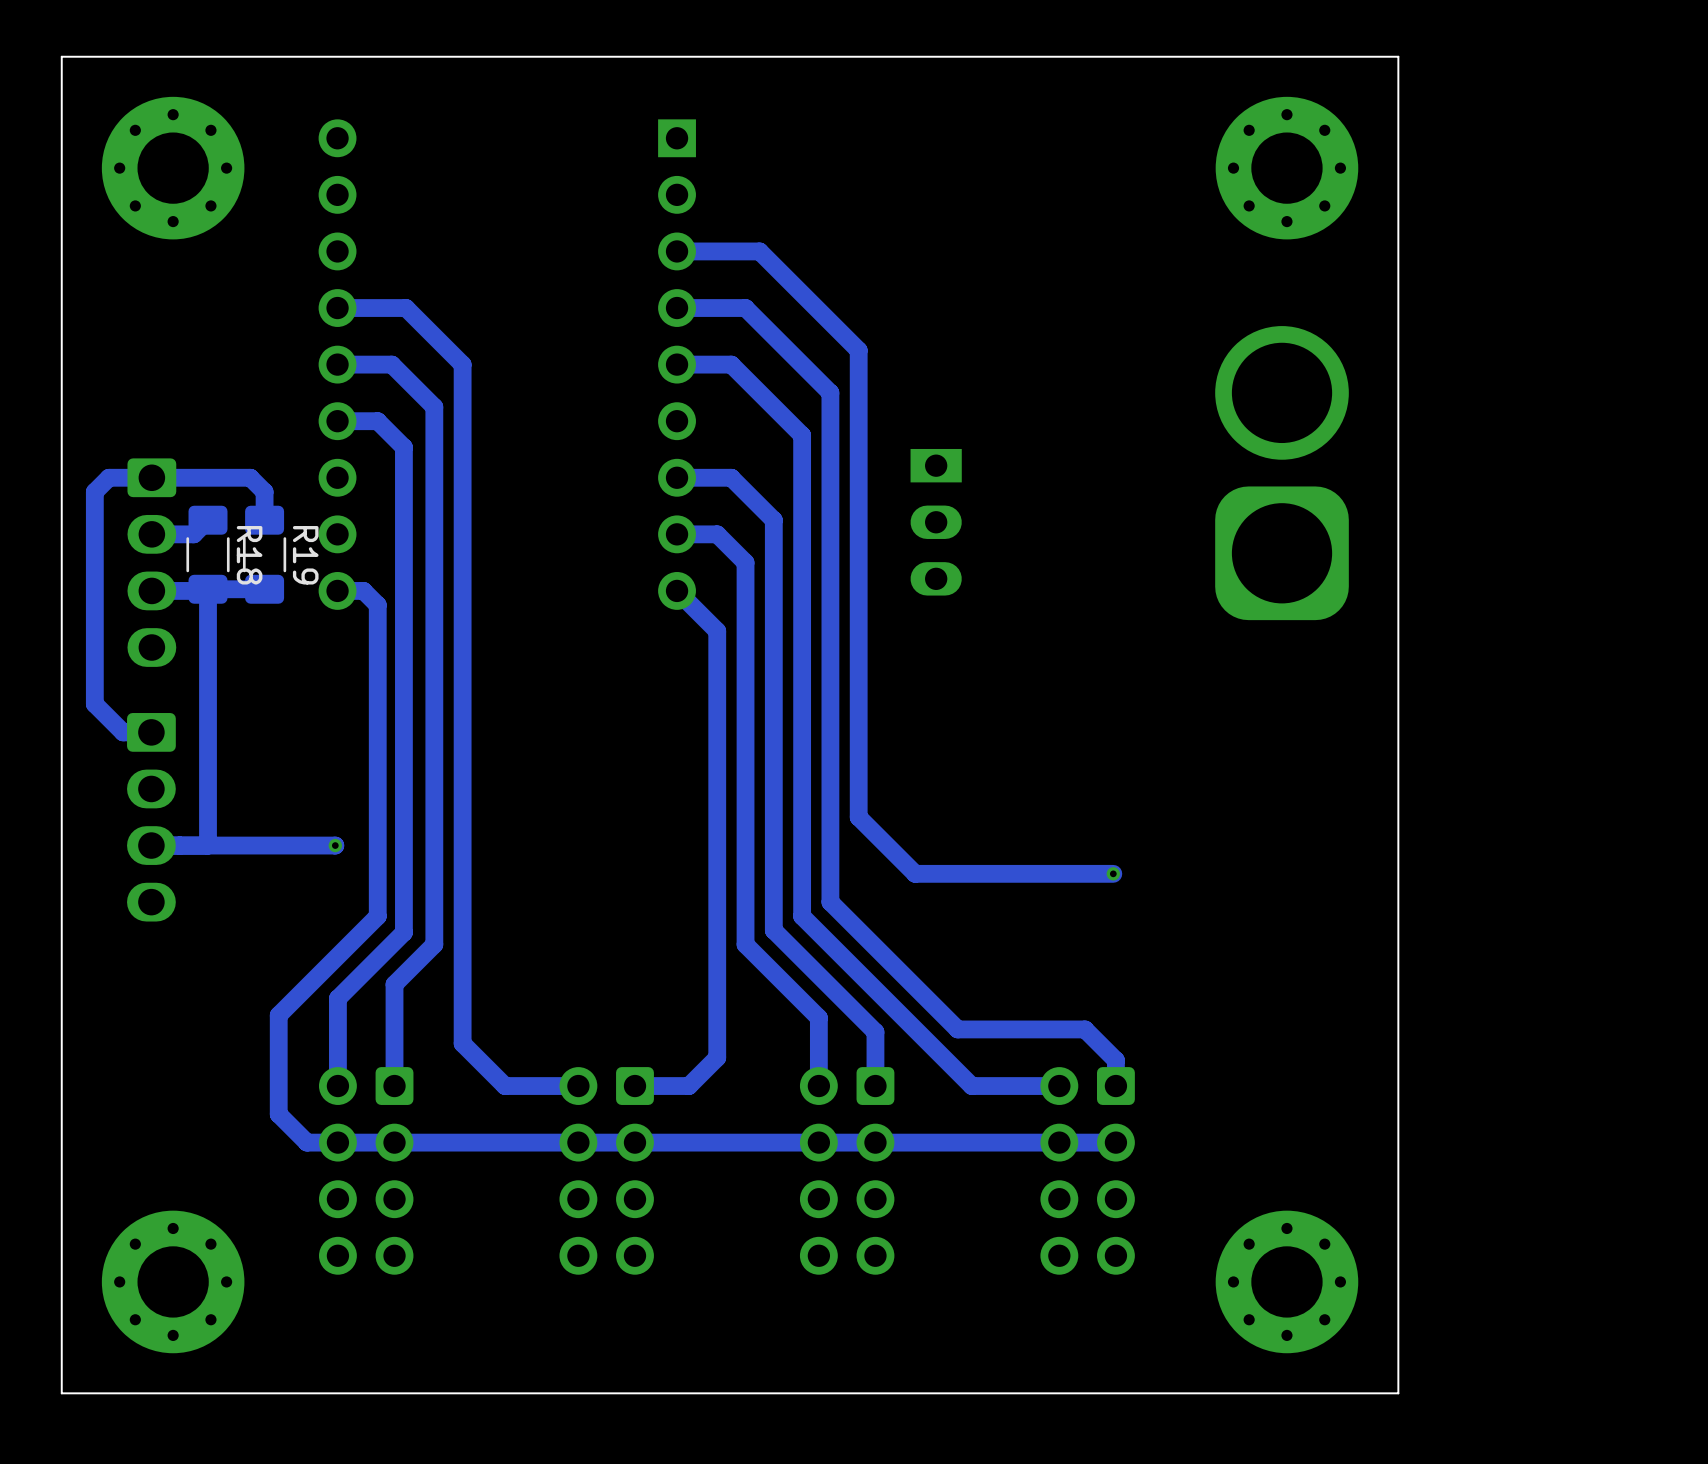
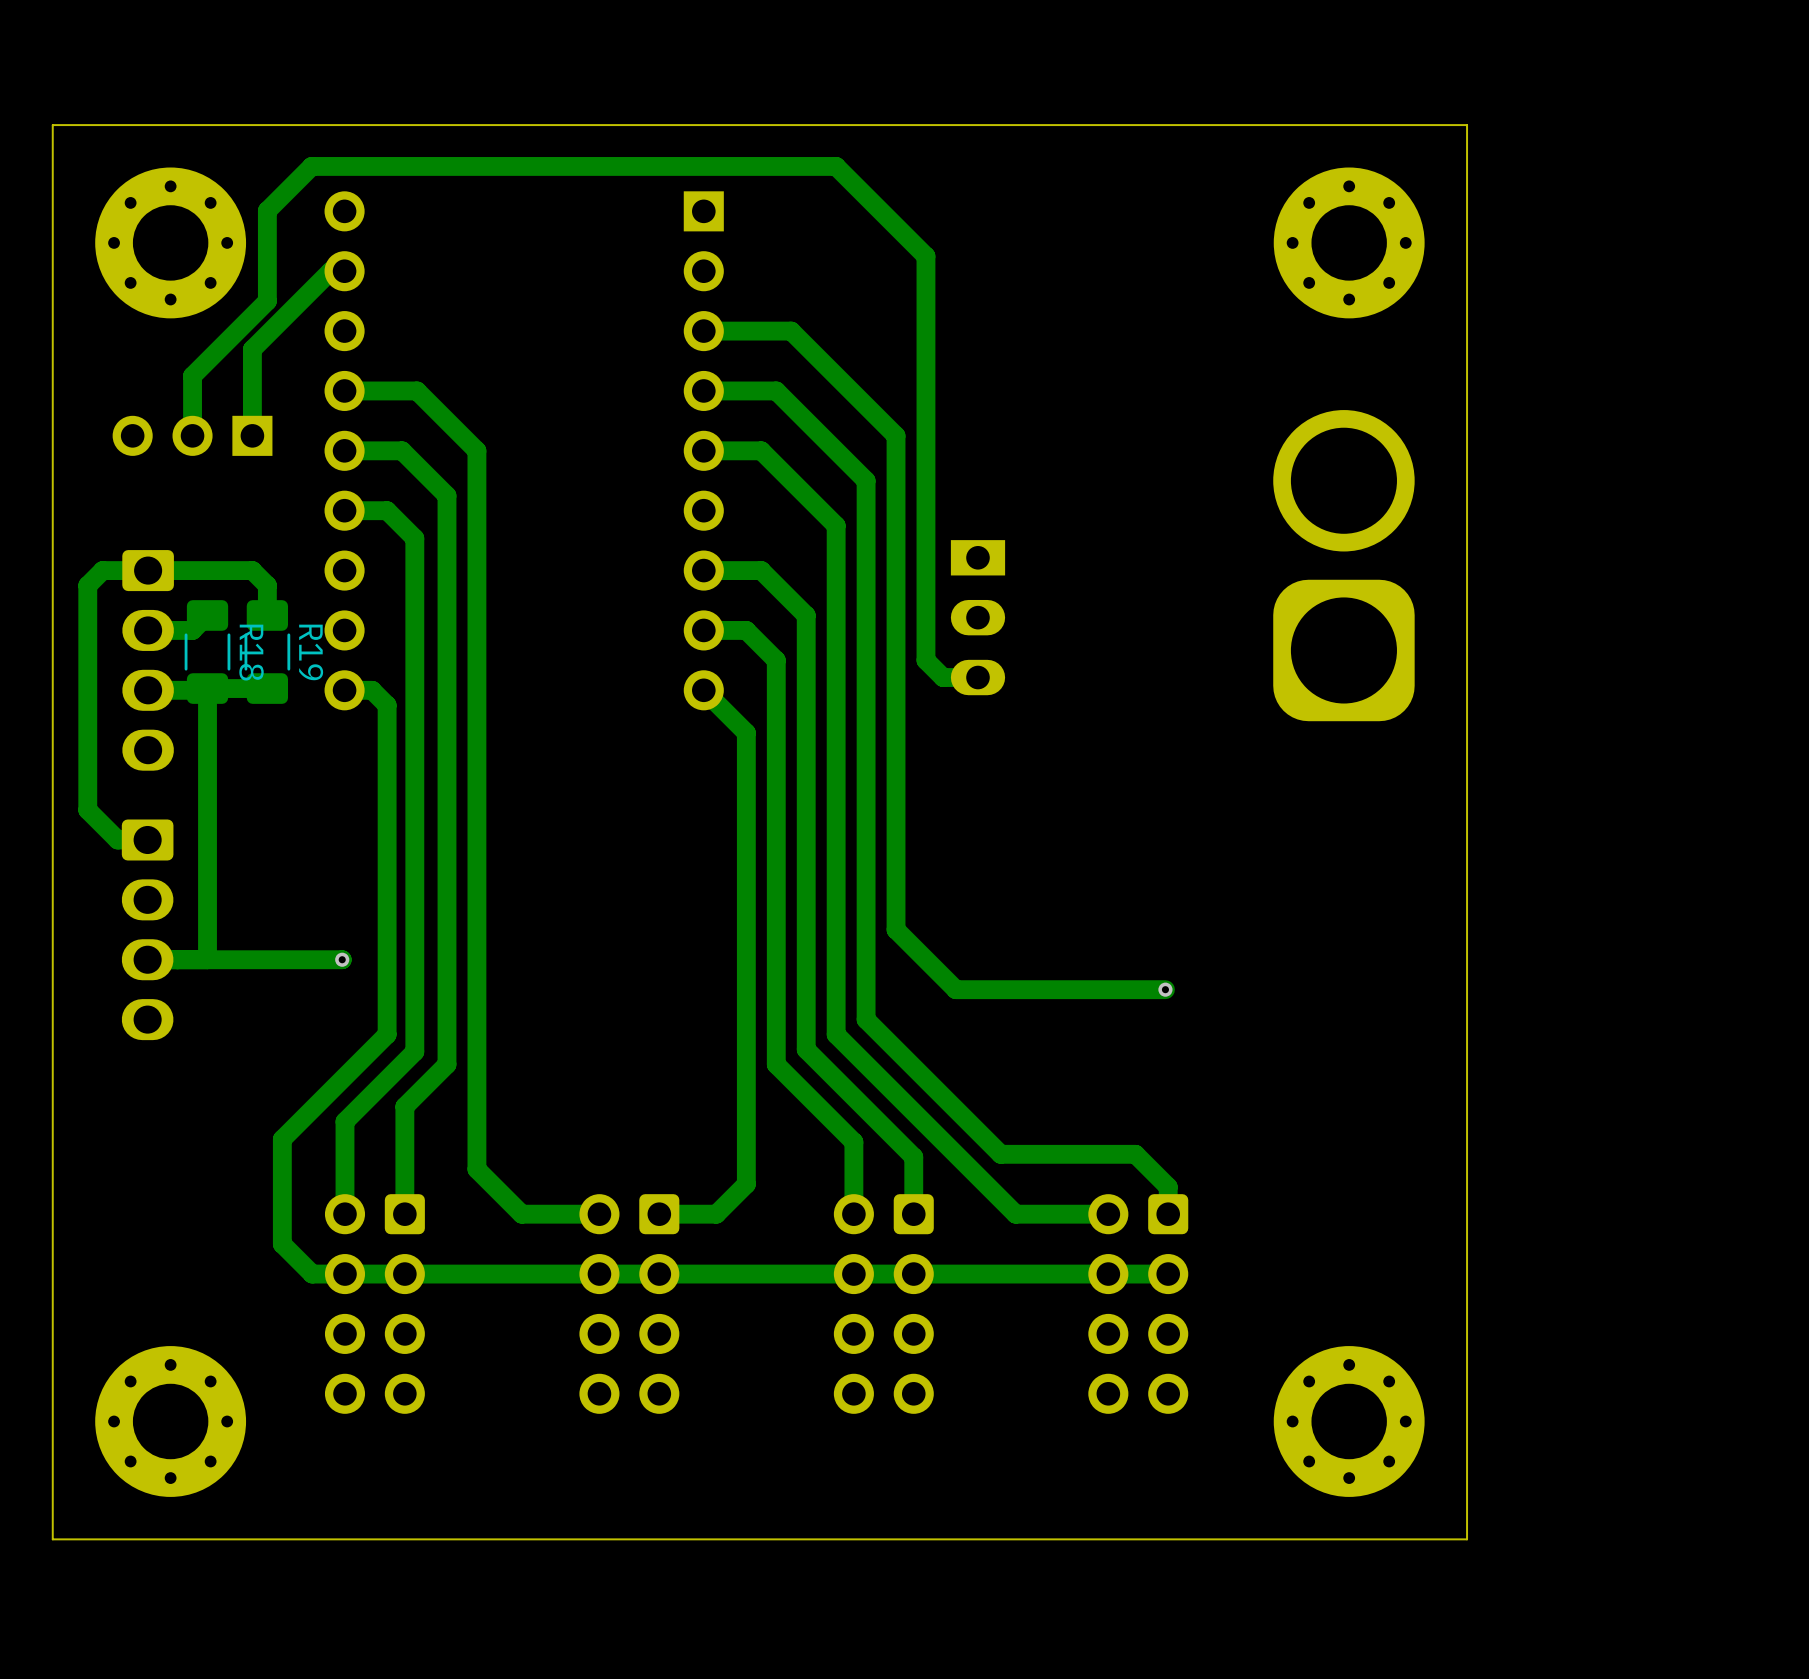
track: none -> (344, 271) (330, 271) (252, 349) (252, 435)
track: none -> (192, 435) (192, 375) (267, 301) (267, 210) (311, 166) (836, 166) (925, 256) (925, 660) (943, 677) (978, 677)
part: none -> (192, 435)

